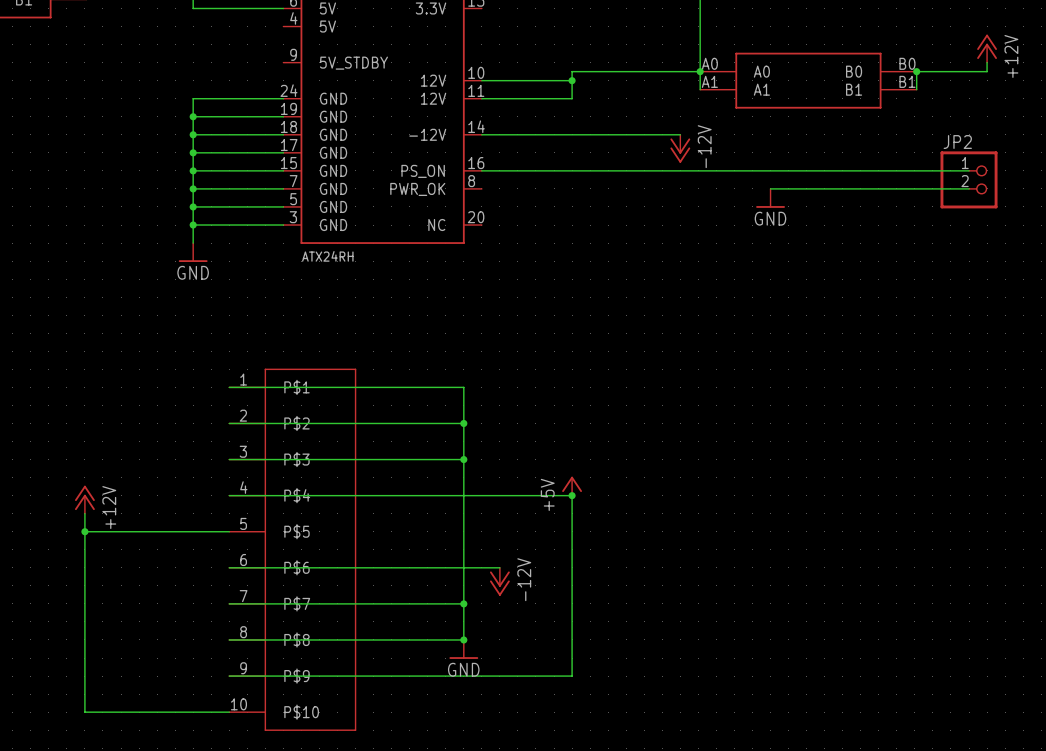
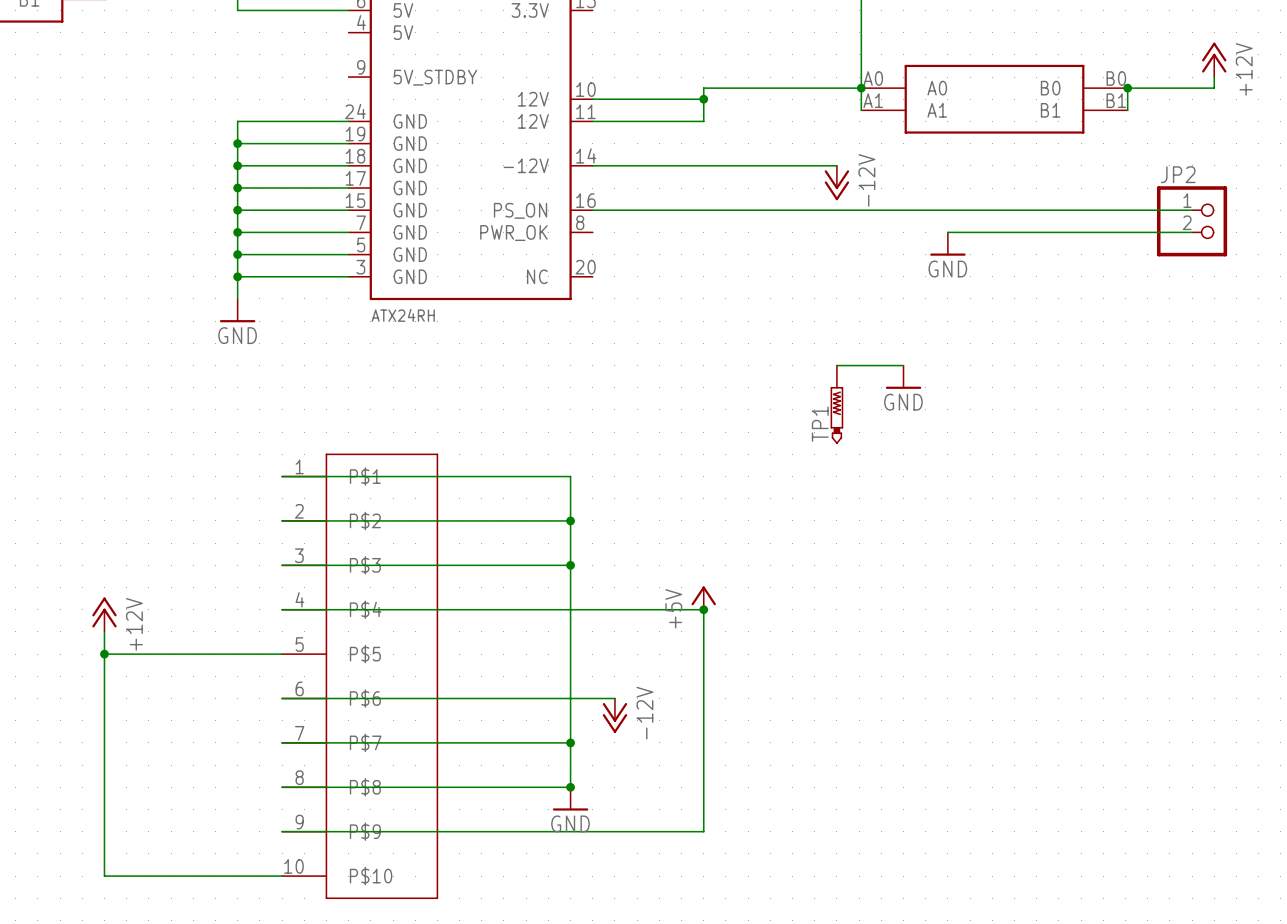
wire: none -> (836, 365) (903, 365)
power symbol: none -> GND (903, 377)
TP1: none -> (836, 404)

